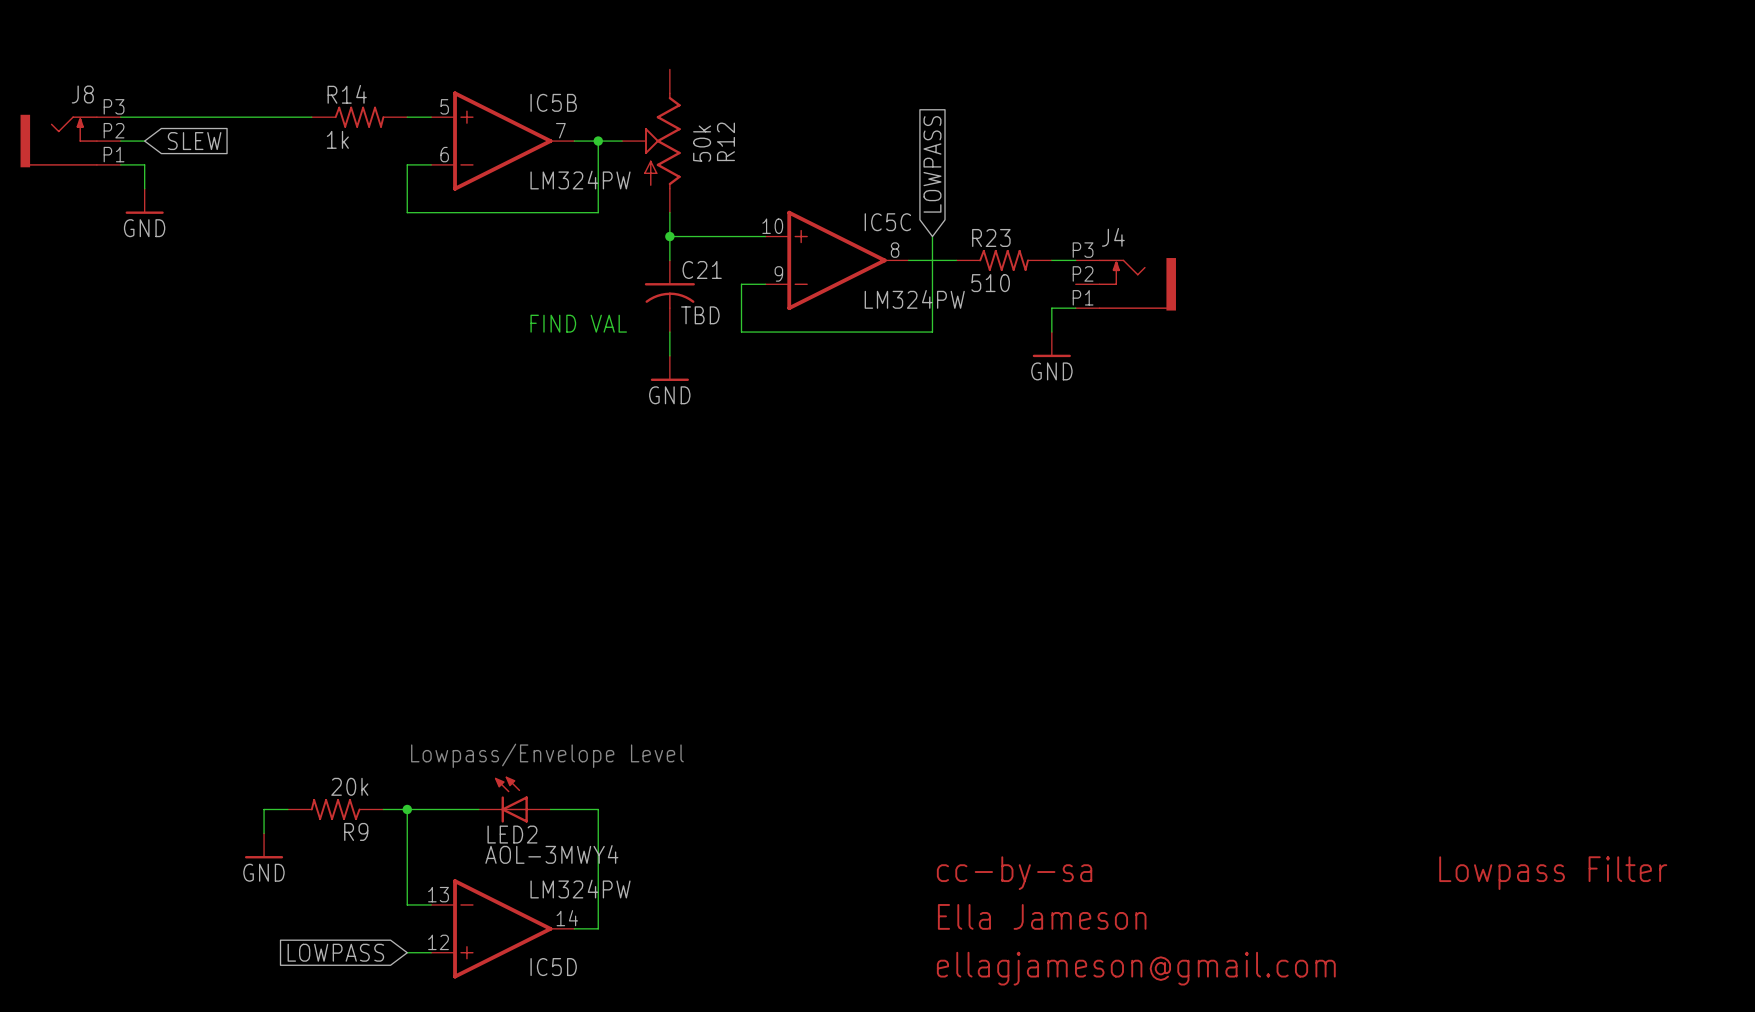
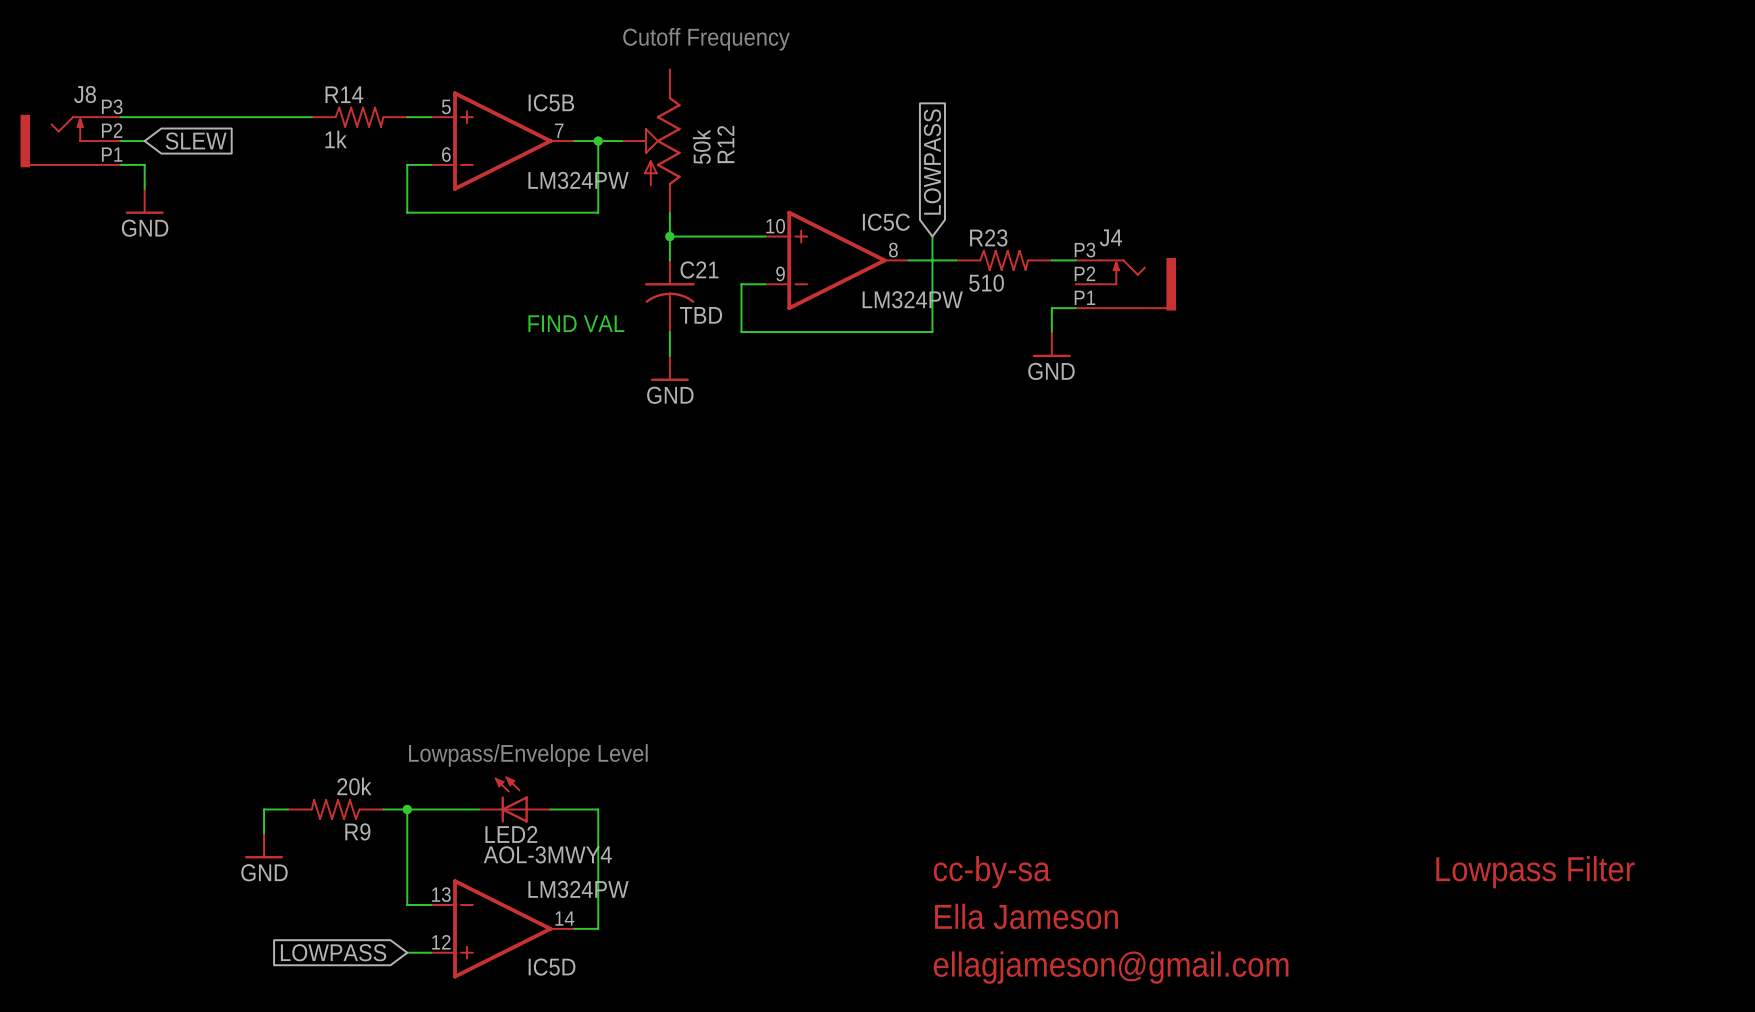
text: none -> Cutoff Frequency (706, 39)

